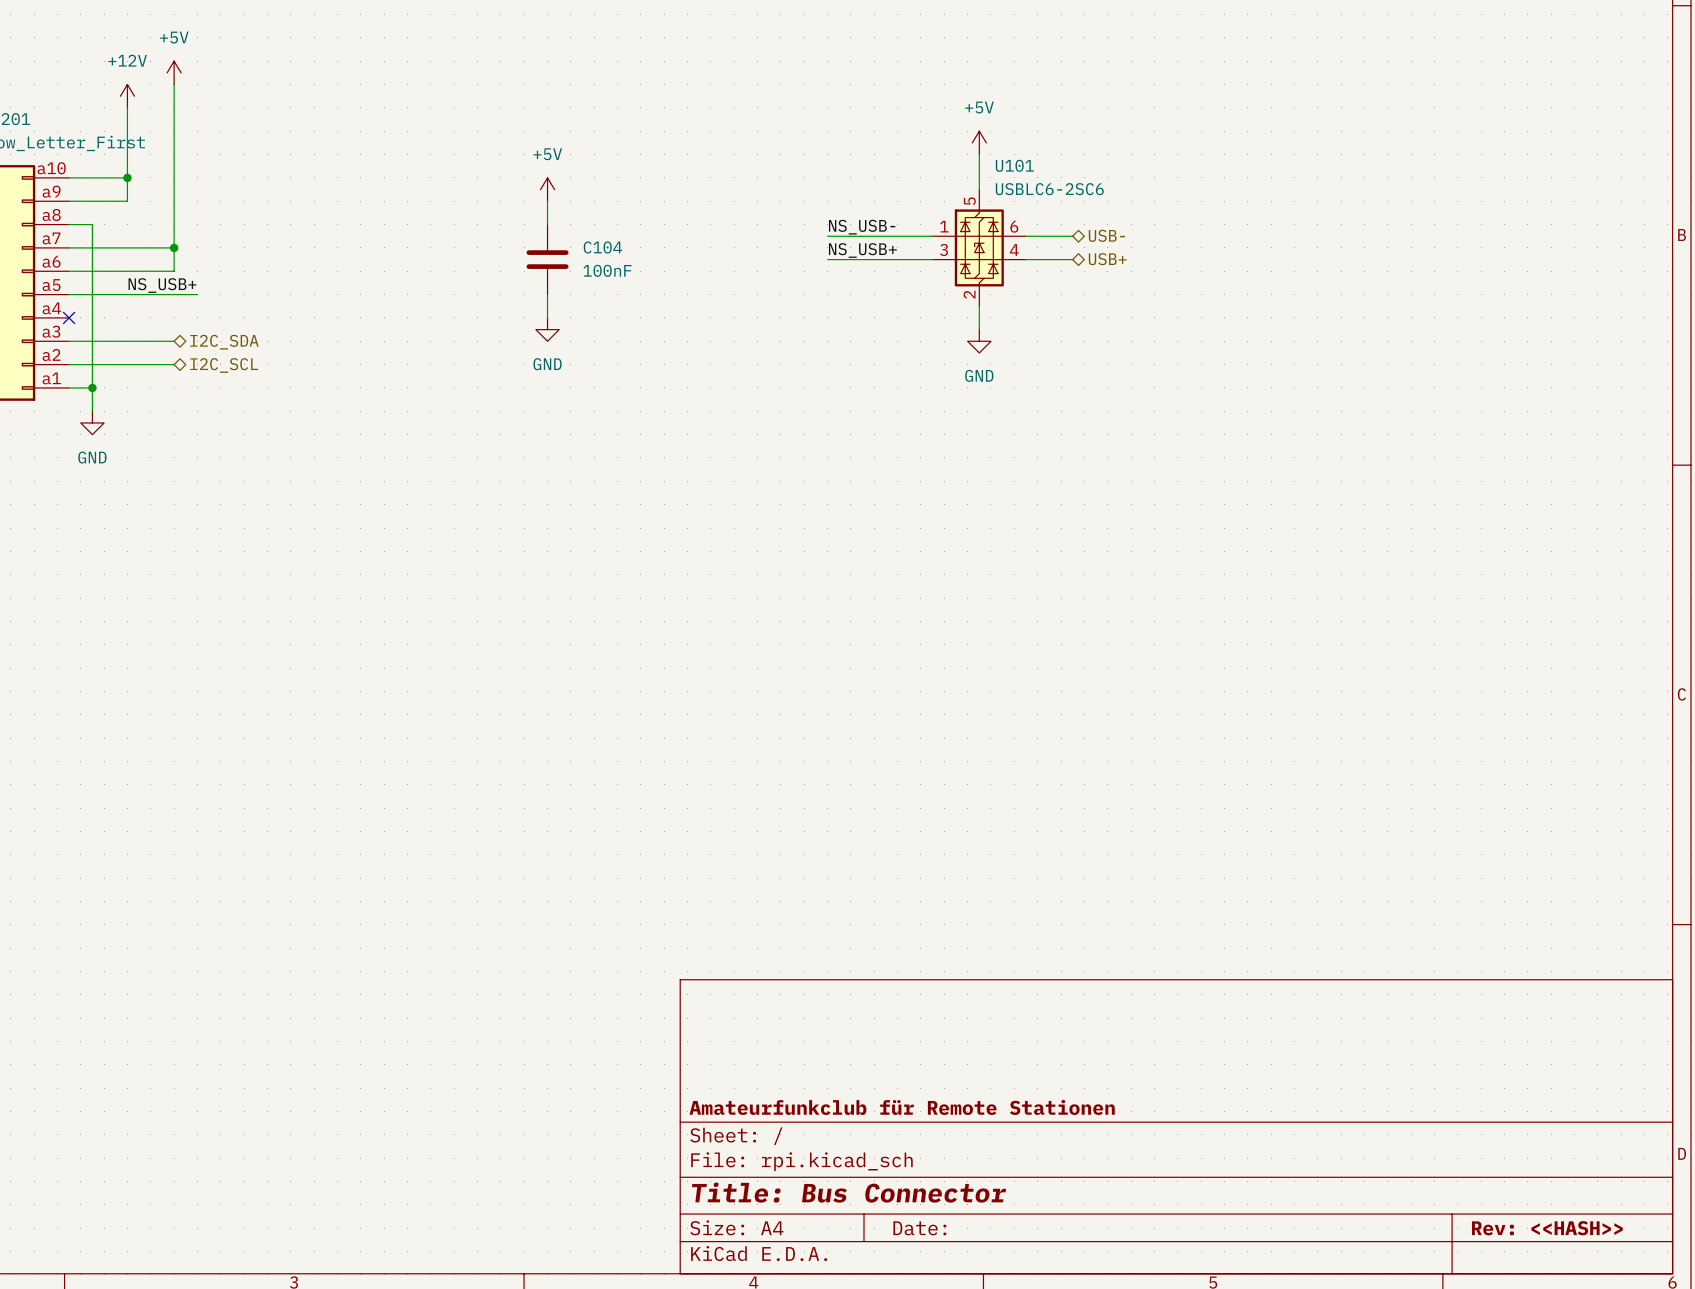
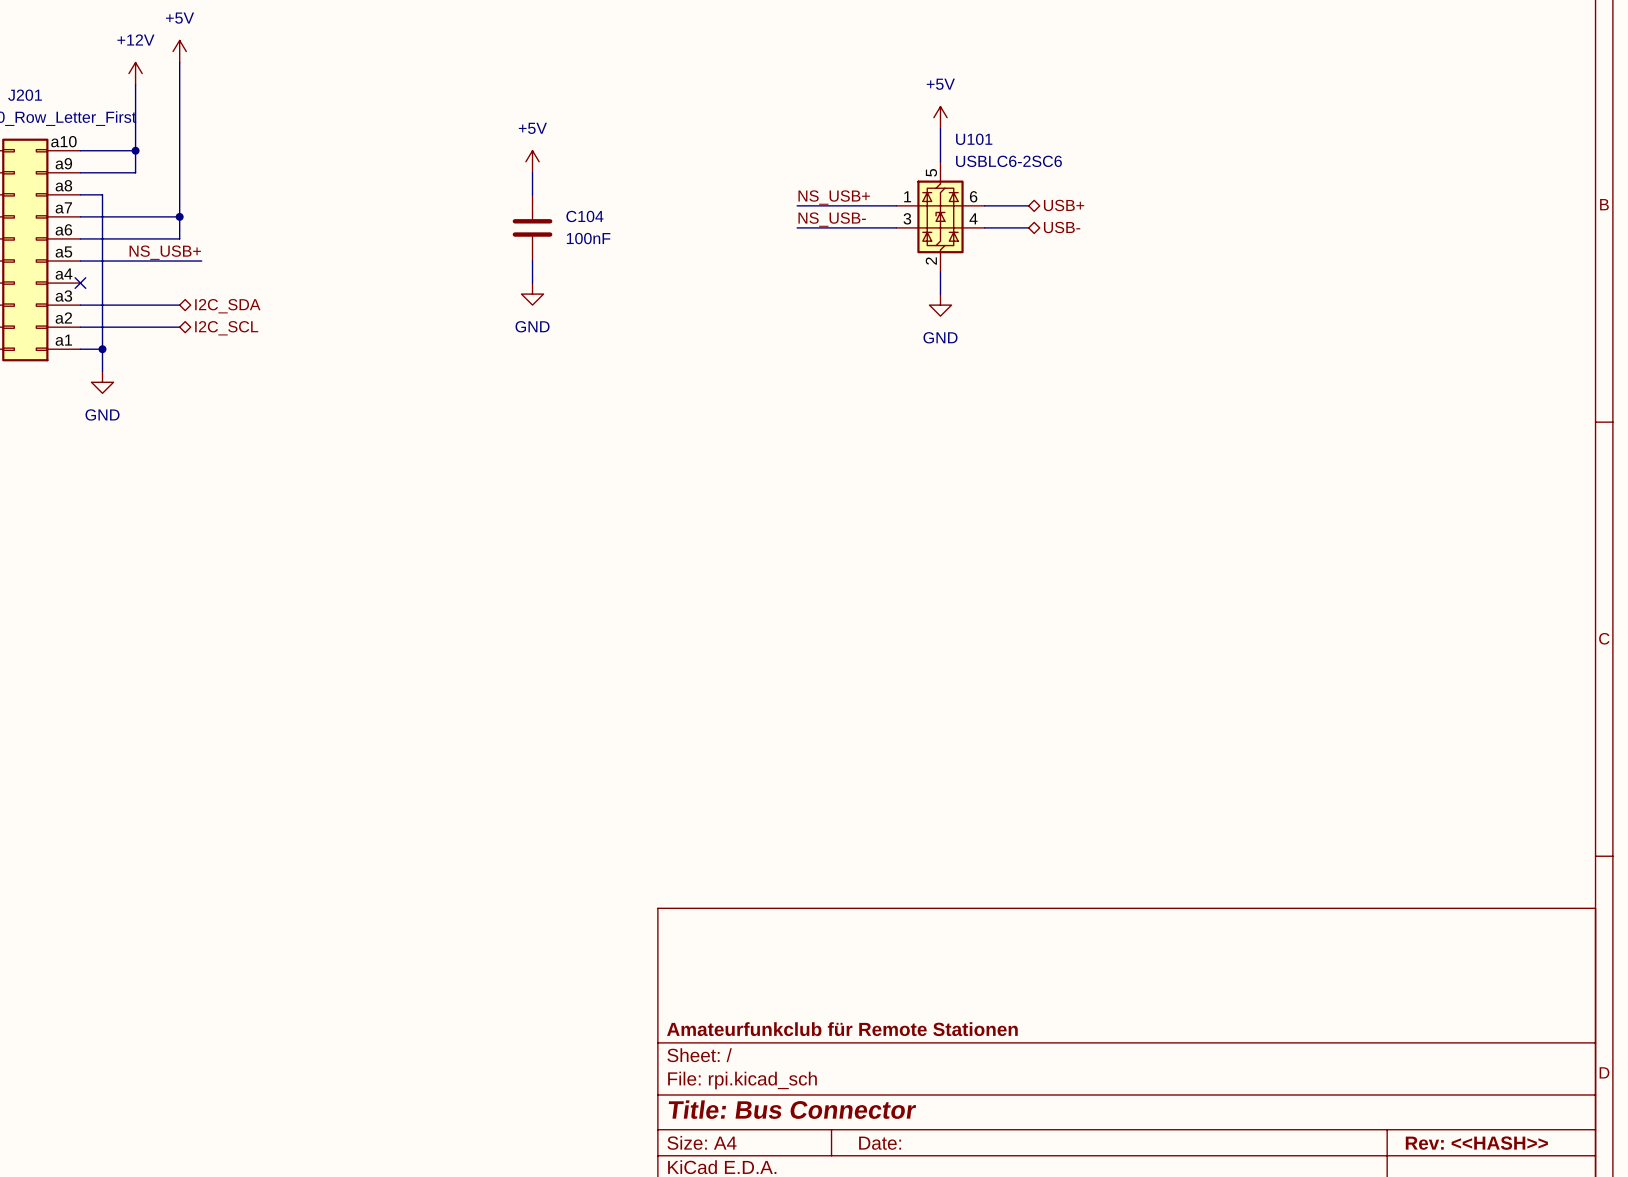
label: NS_USB- (862, 227) -> NS_USB+ (834, 197)
hierarchical label: USB- (1106, 235) -> USB+ (1064, 205)
label: NS_USB+ (862, 250) -> NS_USB- (832, 219)
hierarchical label: USB+ (1107, 259) -> USB- (1062, 227)

